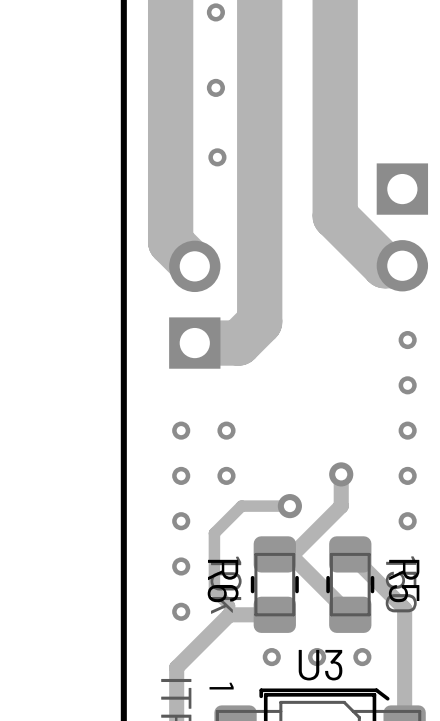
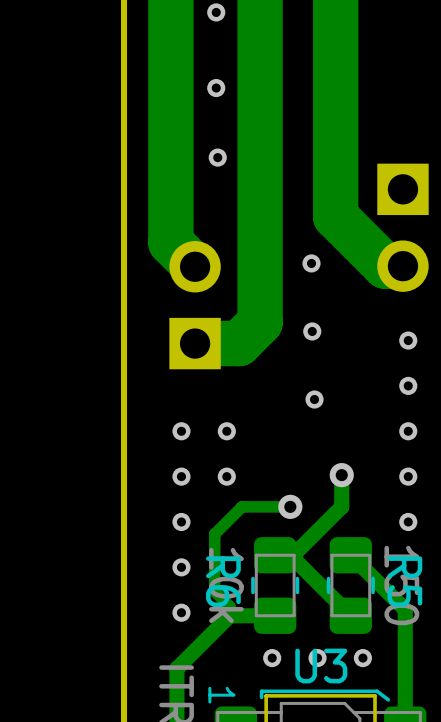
via: none -> (311, 263)
via: none -> (312, 331)
via: none -> (314, 399)

